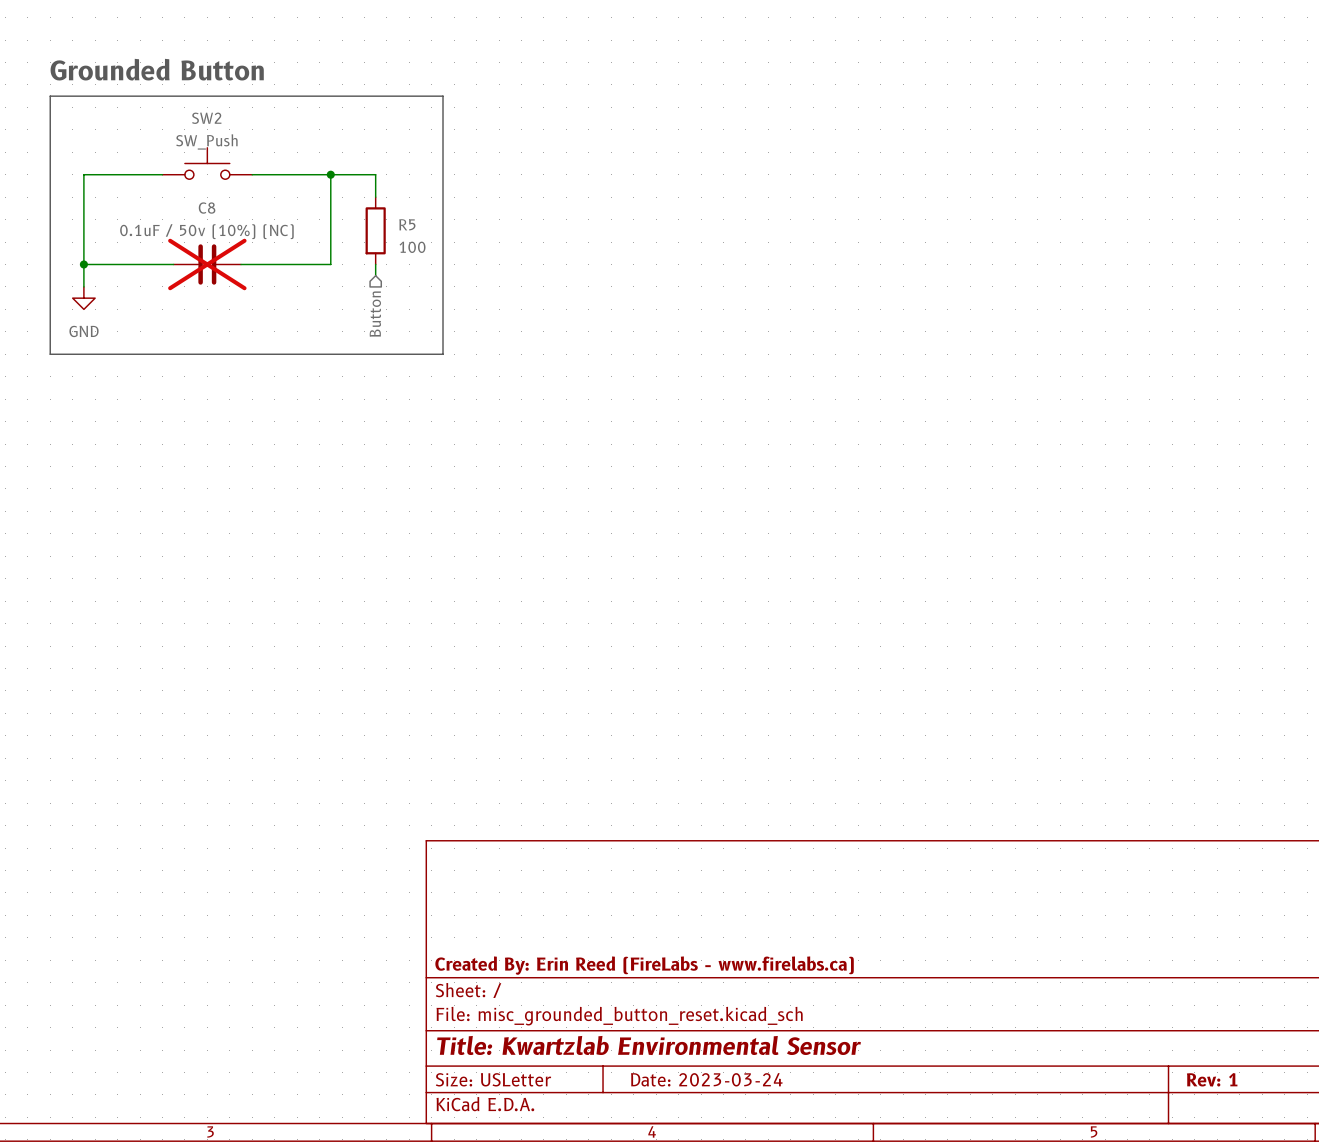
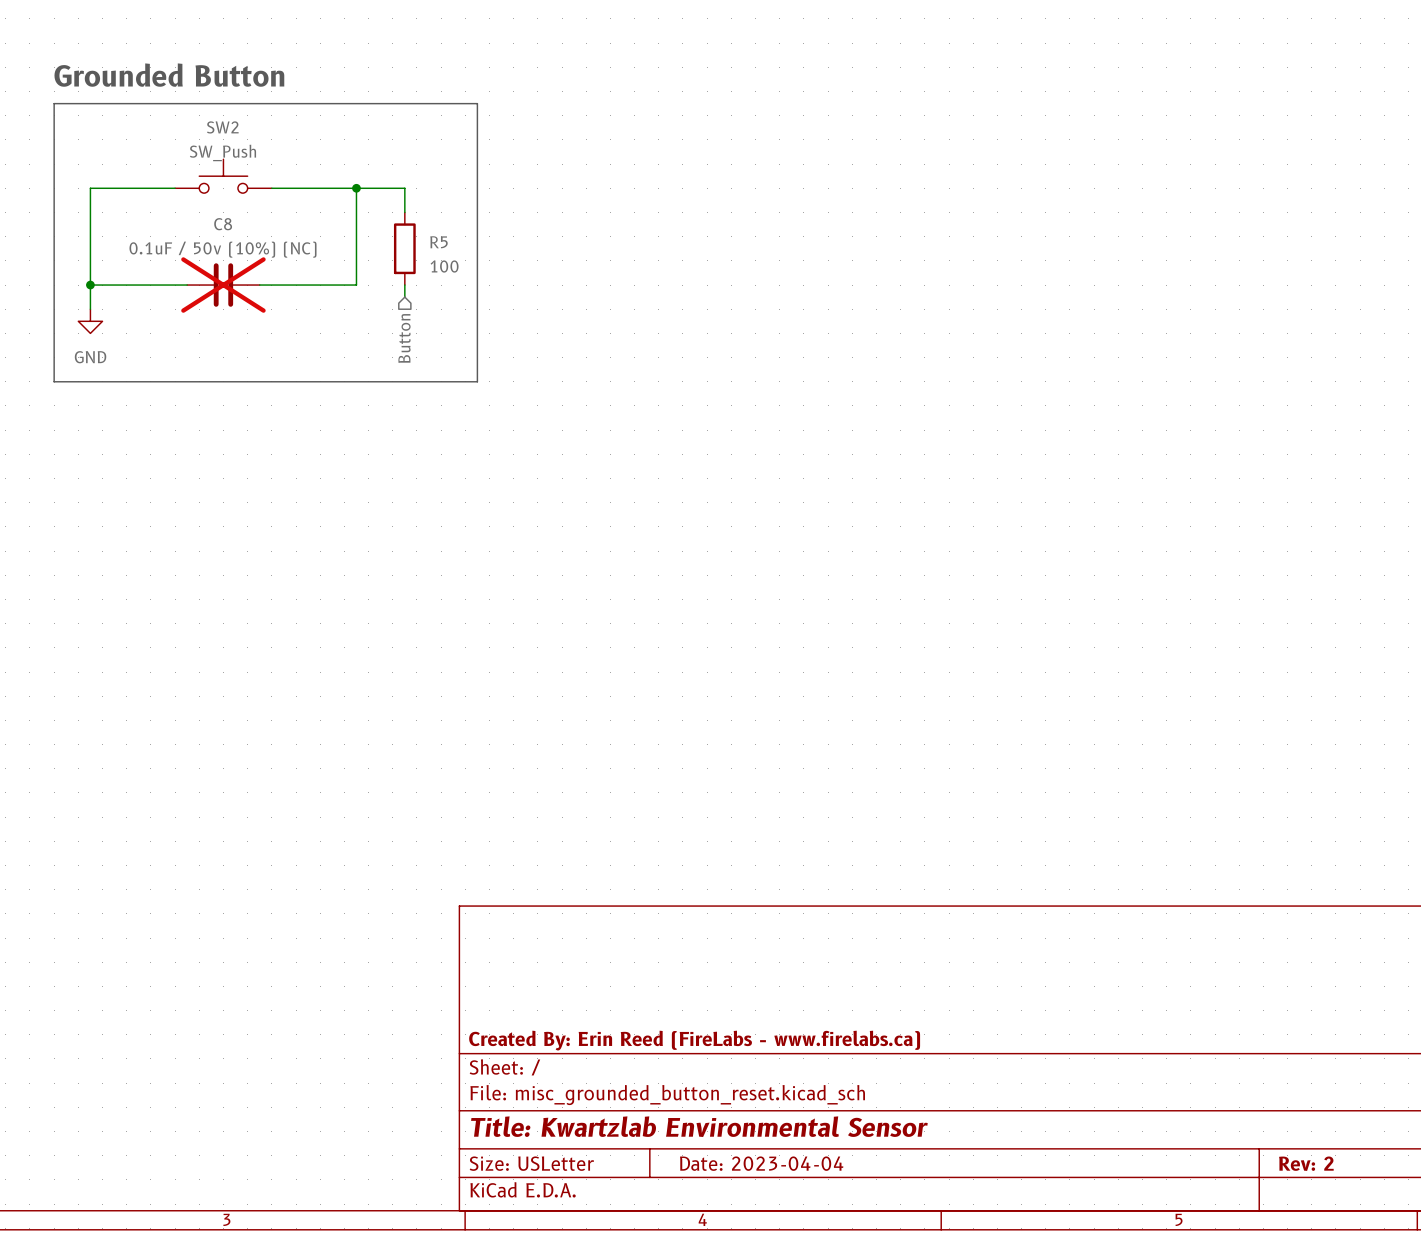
title block: Date: 2023-03-24 (706, 1079) -> Date: 2023-04-04 (761, 1163)
title block: Rev: 1 (1212, 1079) -> Rev: 2 (1306, 1163)

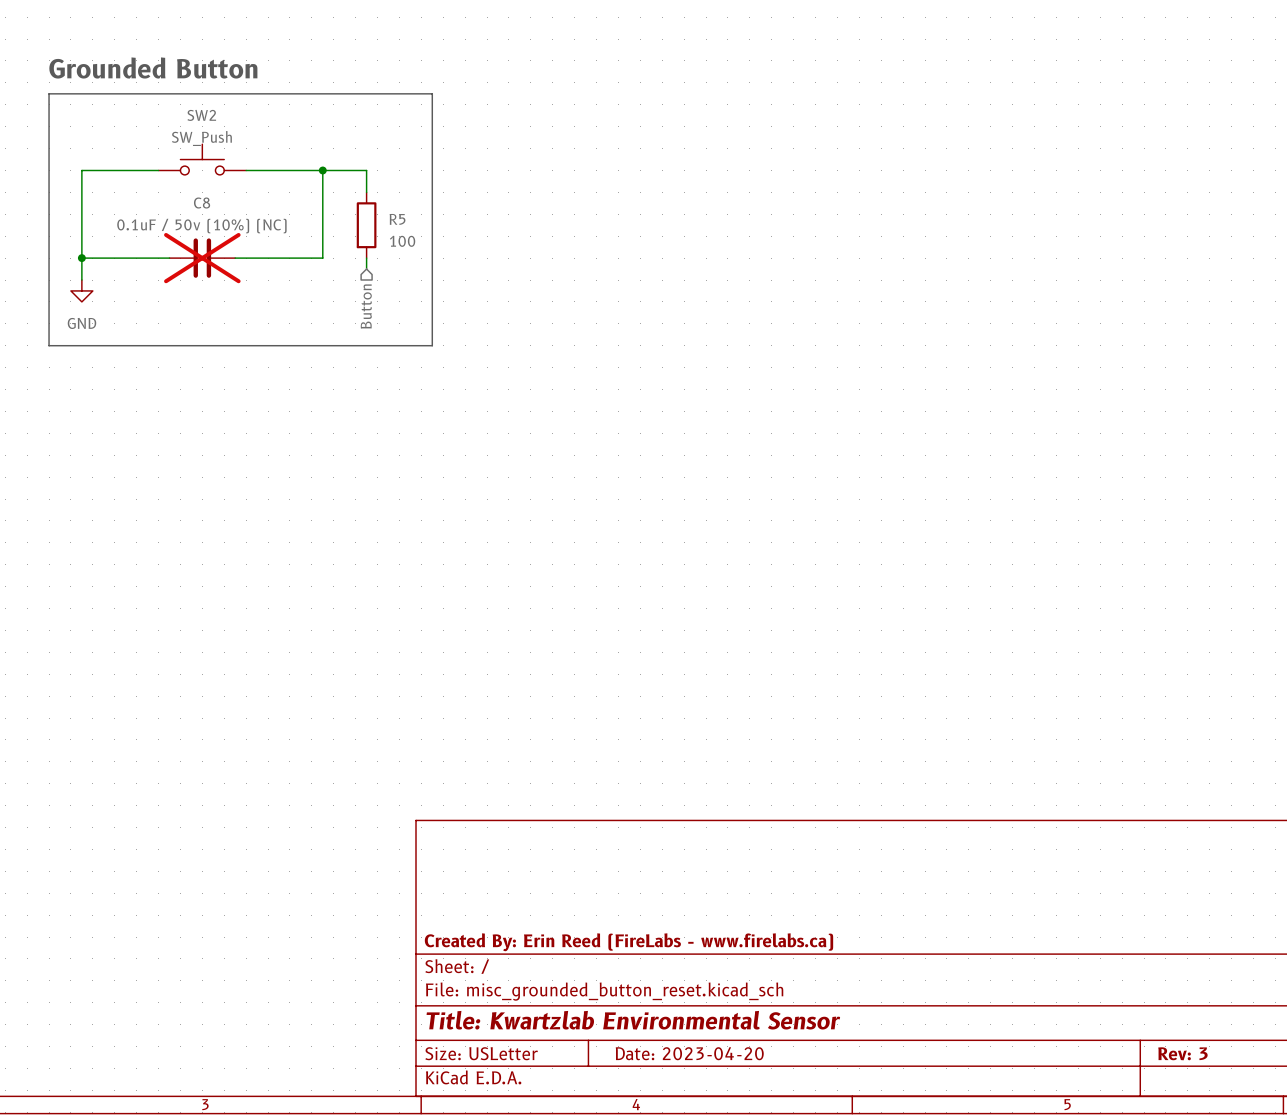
title block: Date: 2023-04-04 (761, 1163) -> Date: 2023-04-20 (689, 1053)
title block: Rev: 2 (1306, 1163) -> Rev: 3 (1182, 1053)

